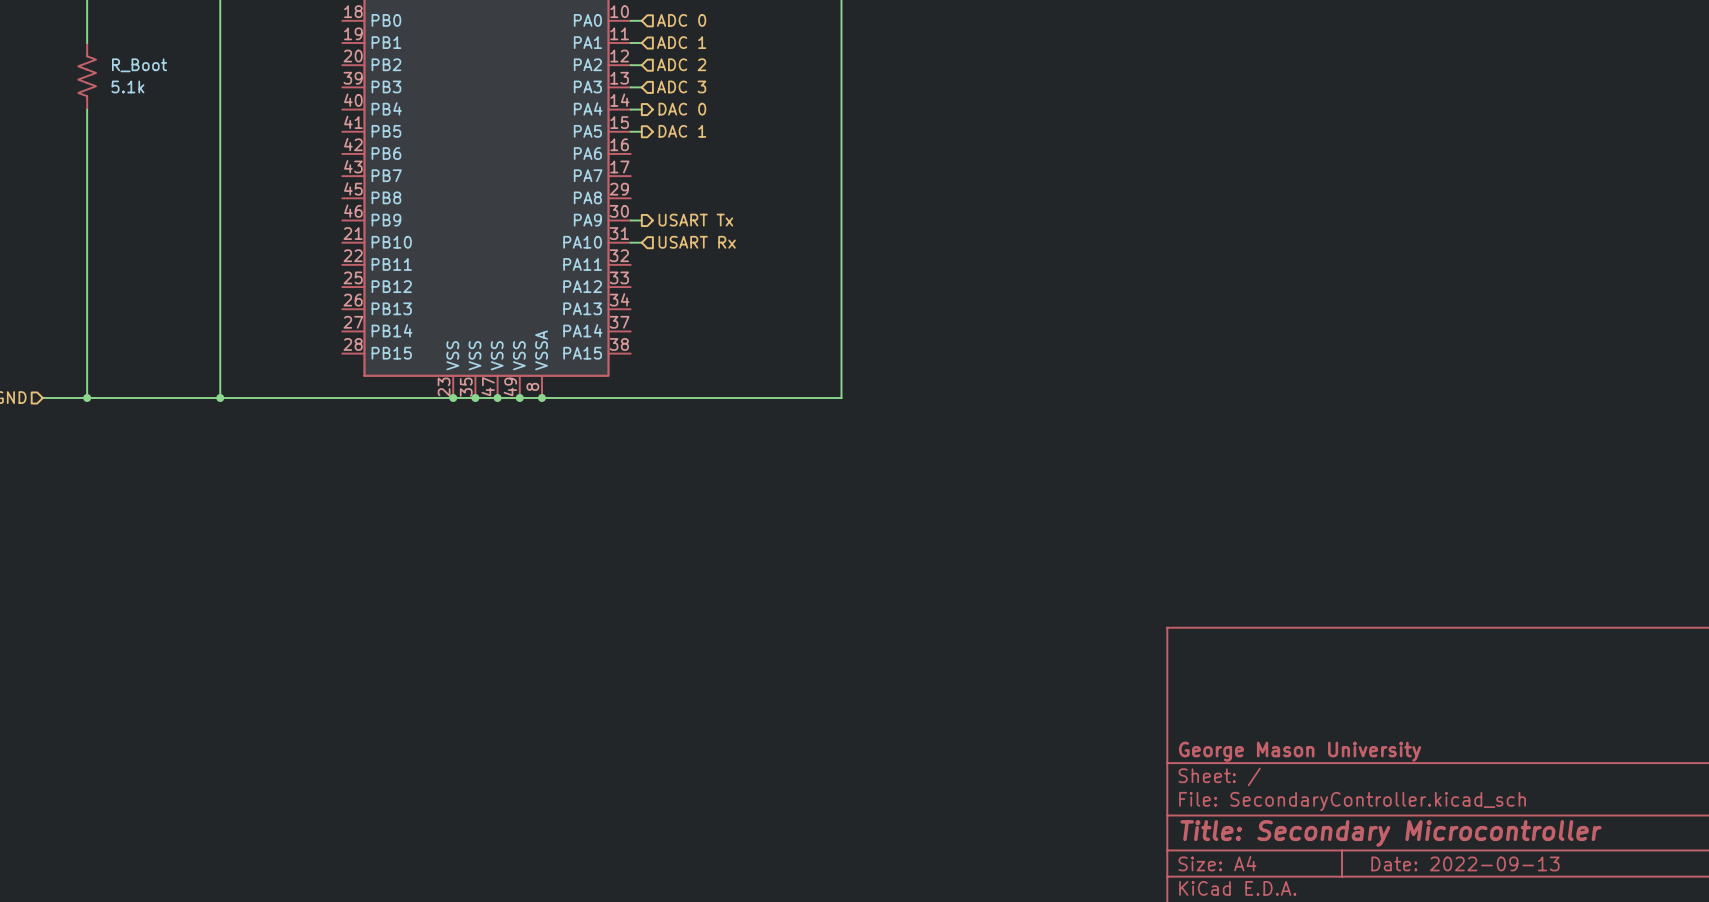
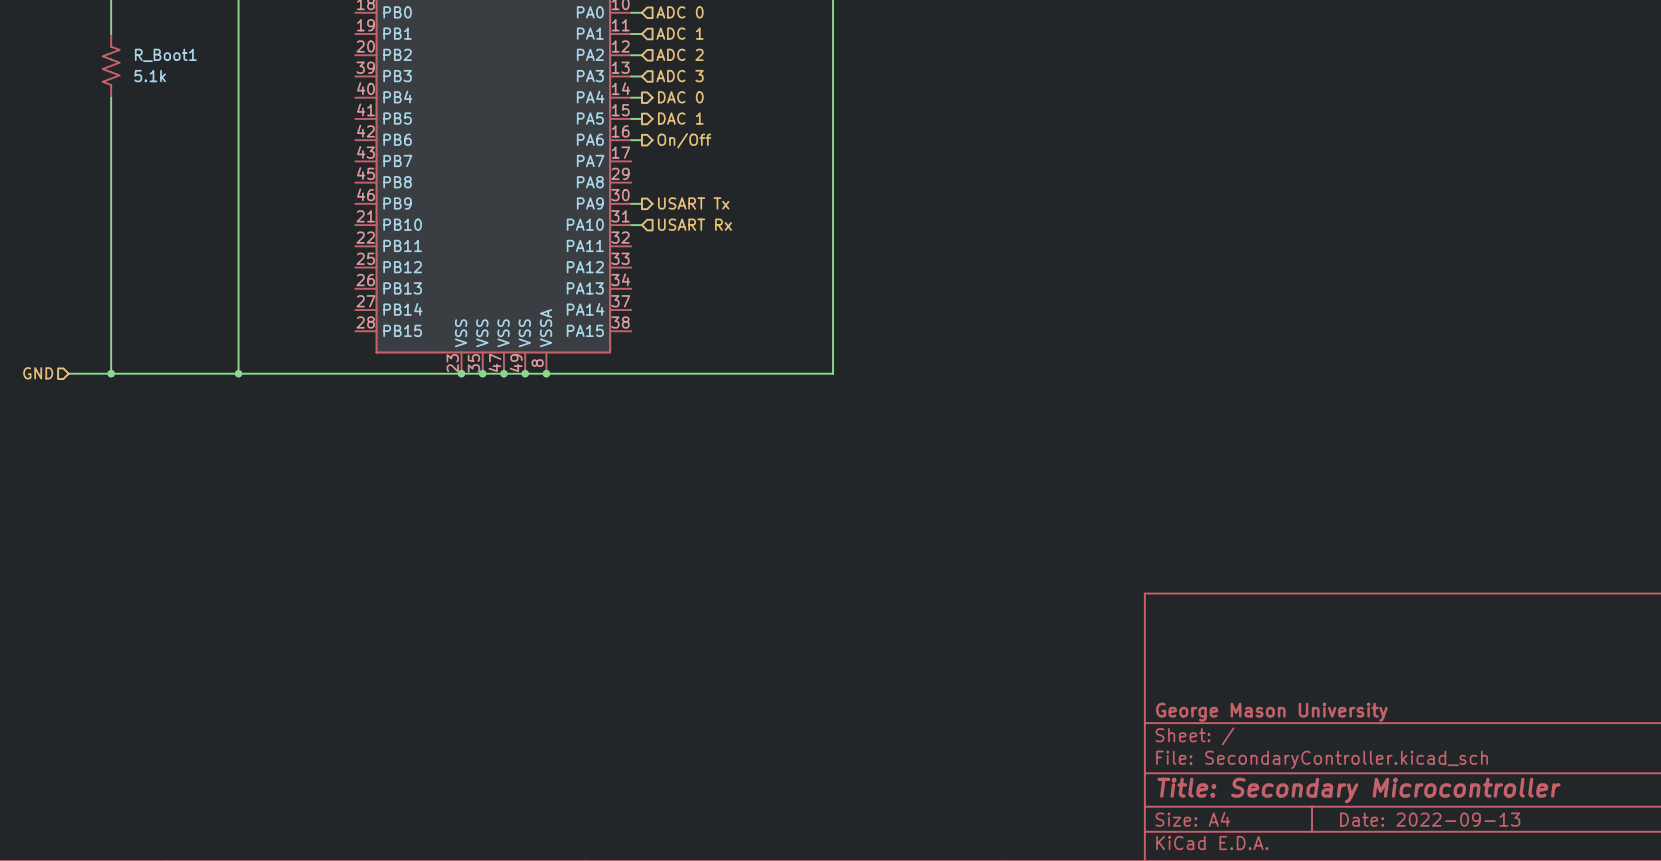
R_Boot name: R_Boot (139, 65) -> R_Boot1 (165, 55)
wire: none -> (631, 140) (641, 140)
hierarchical label: none -> On/Off (684, 140)

